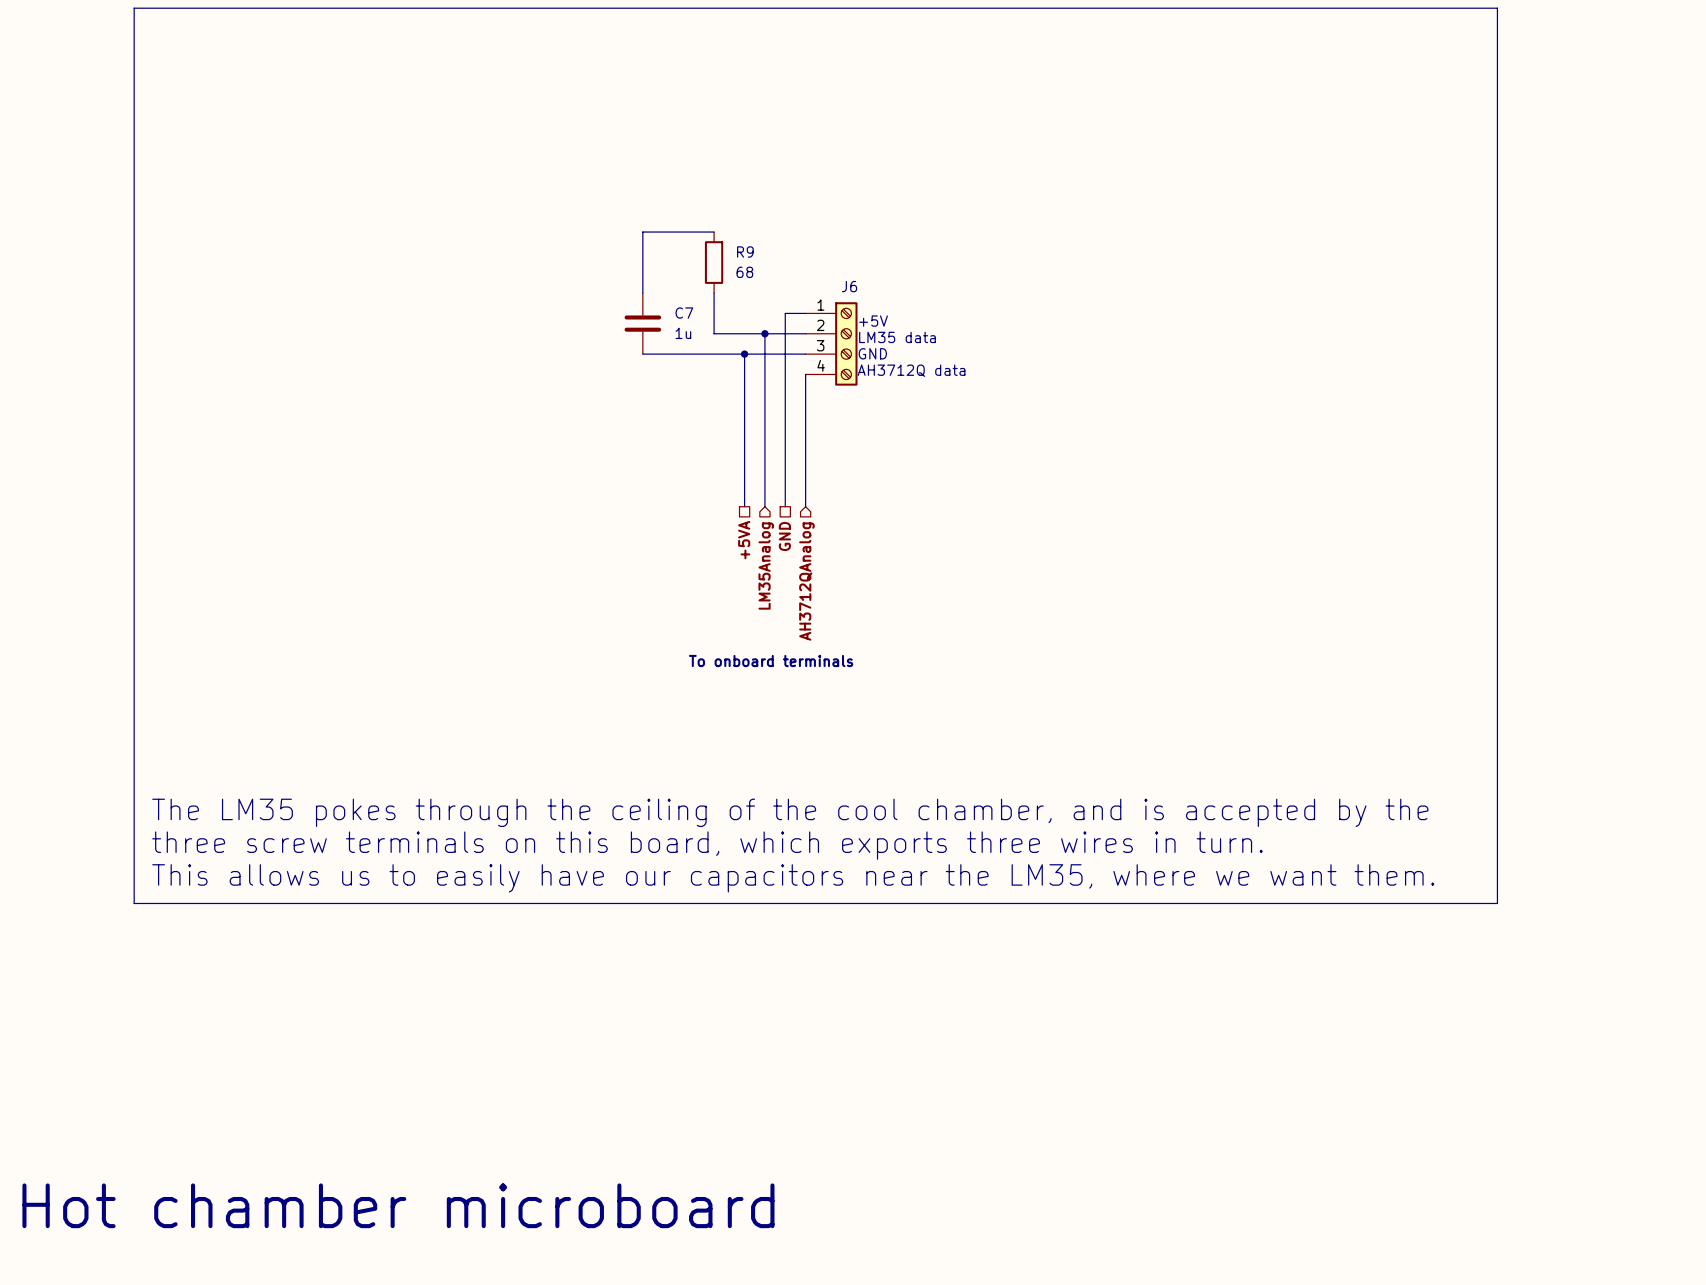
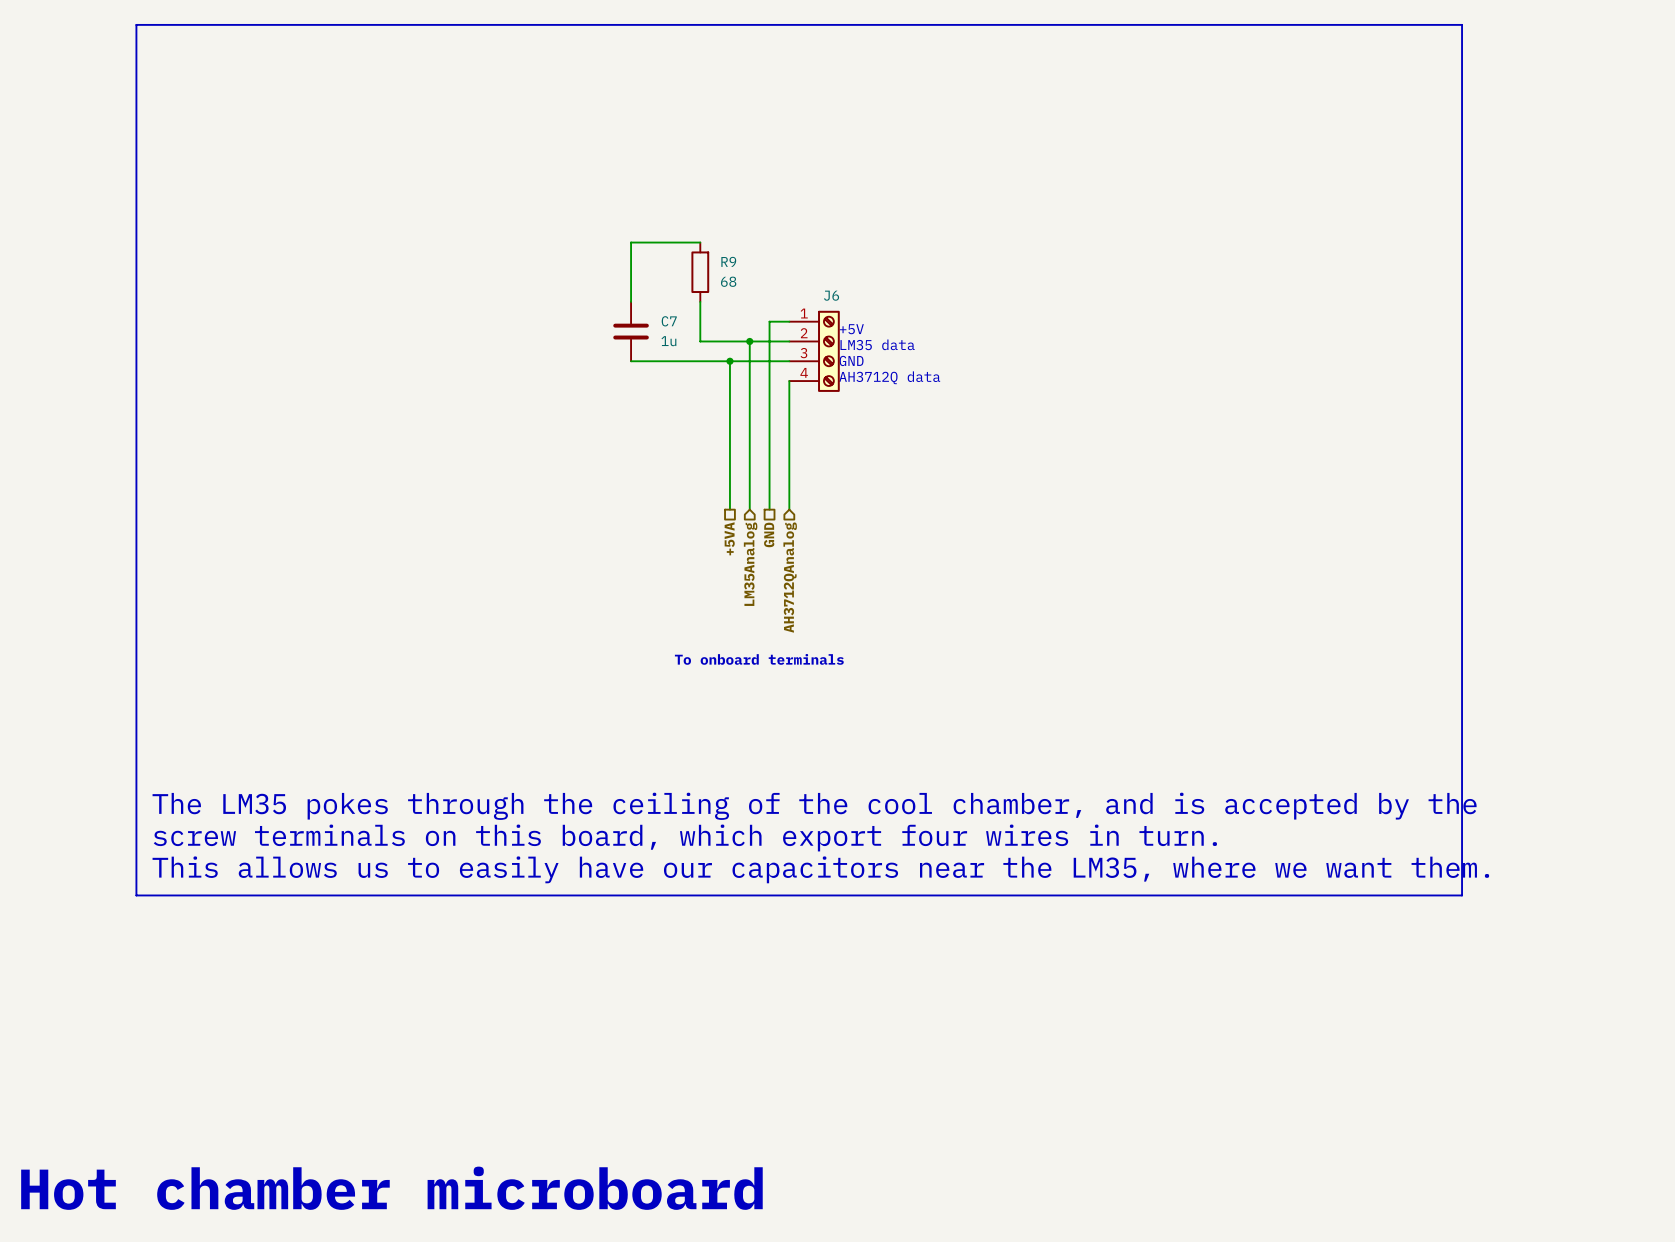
text: three screw terminals on this board, which exports three wires in turn. (707, 845) -> screw terminals on this board, which export four wires in turn. (685, 837)

